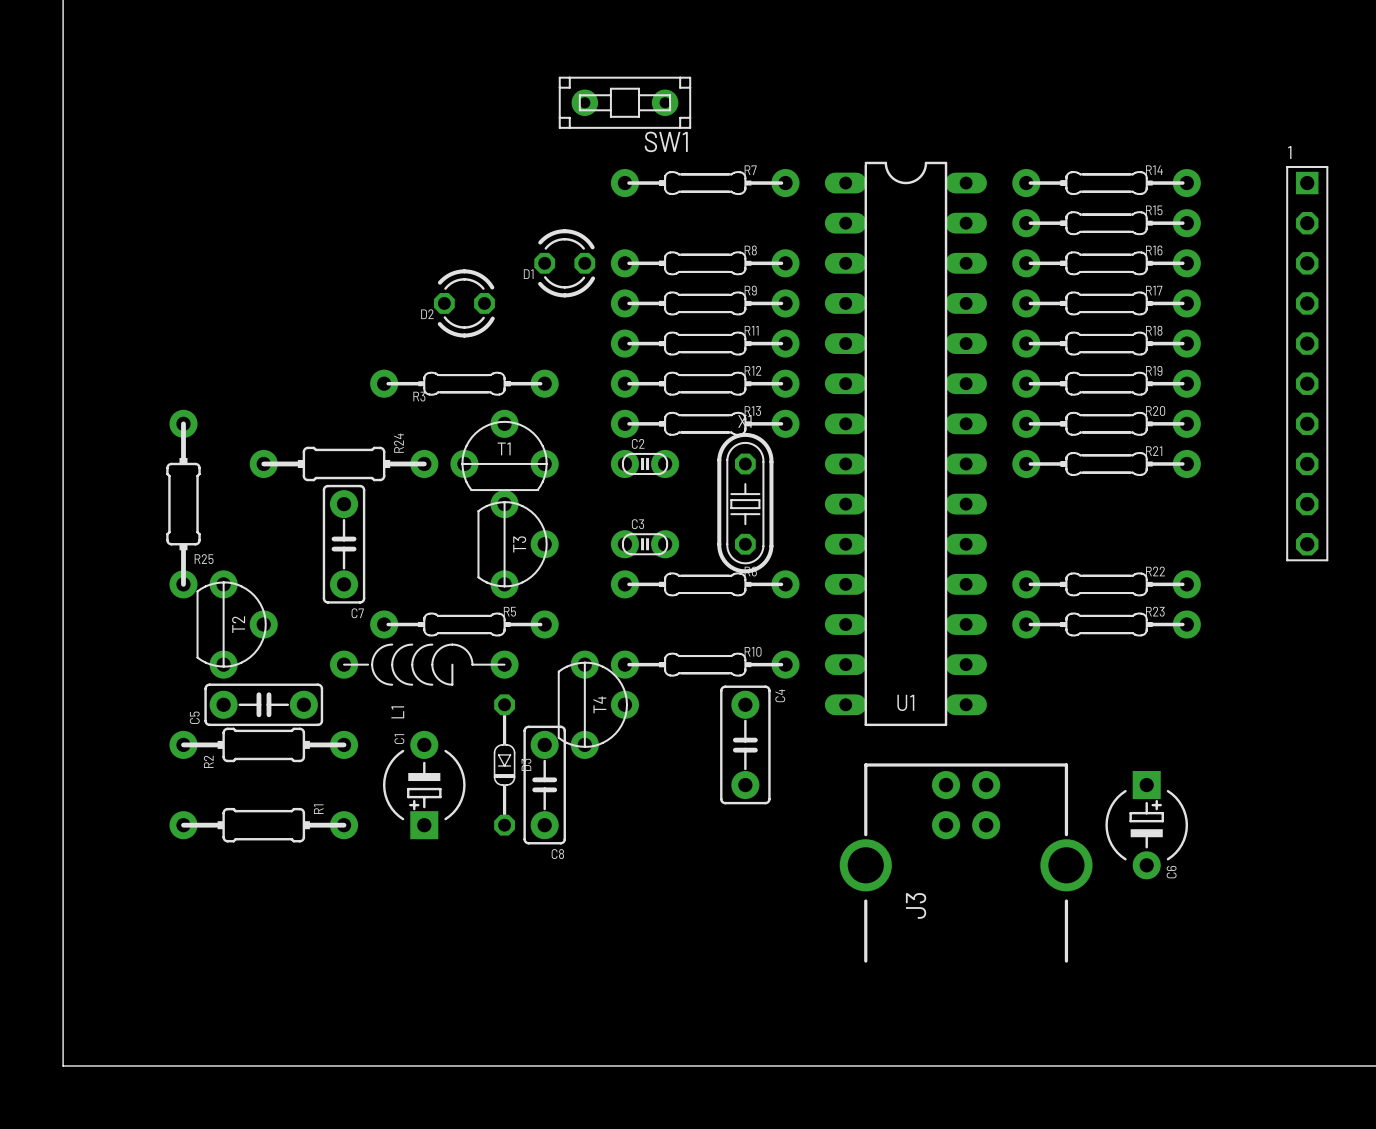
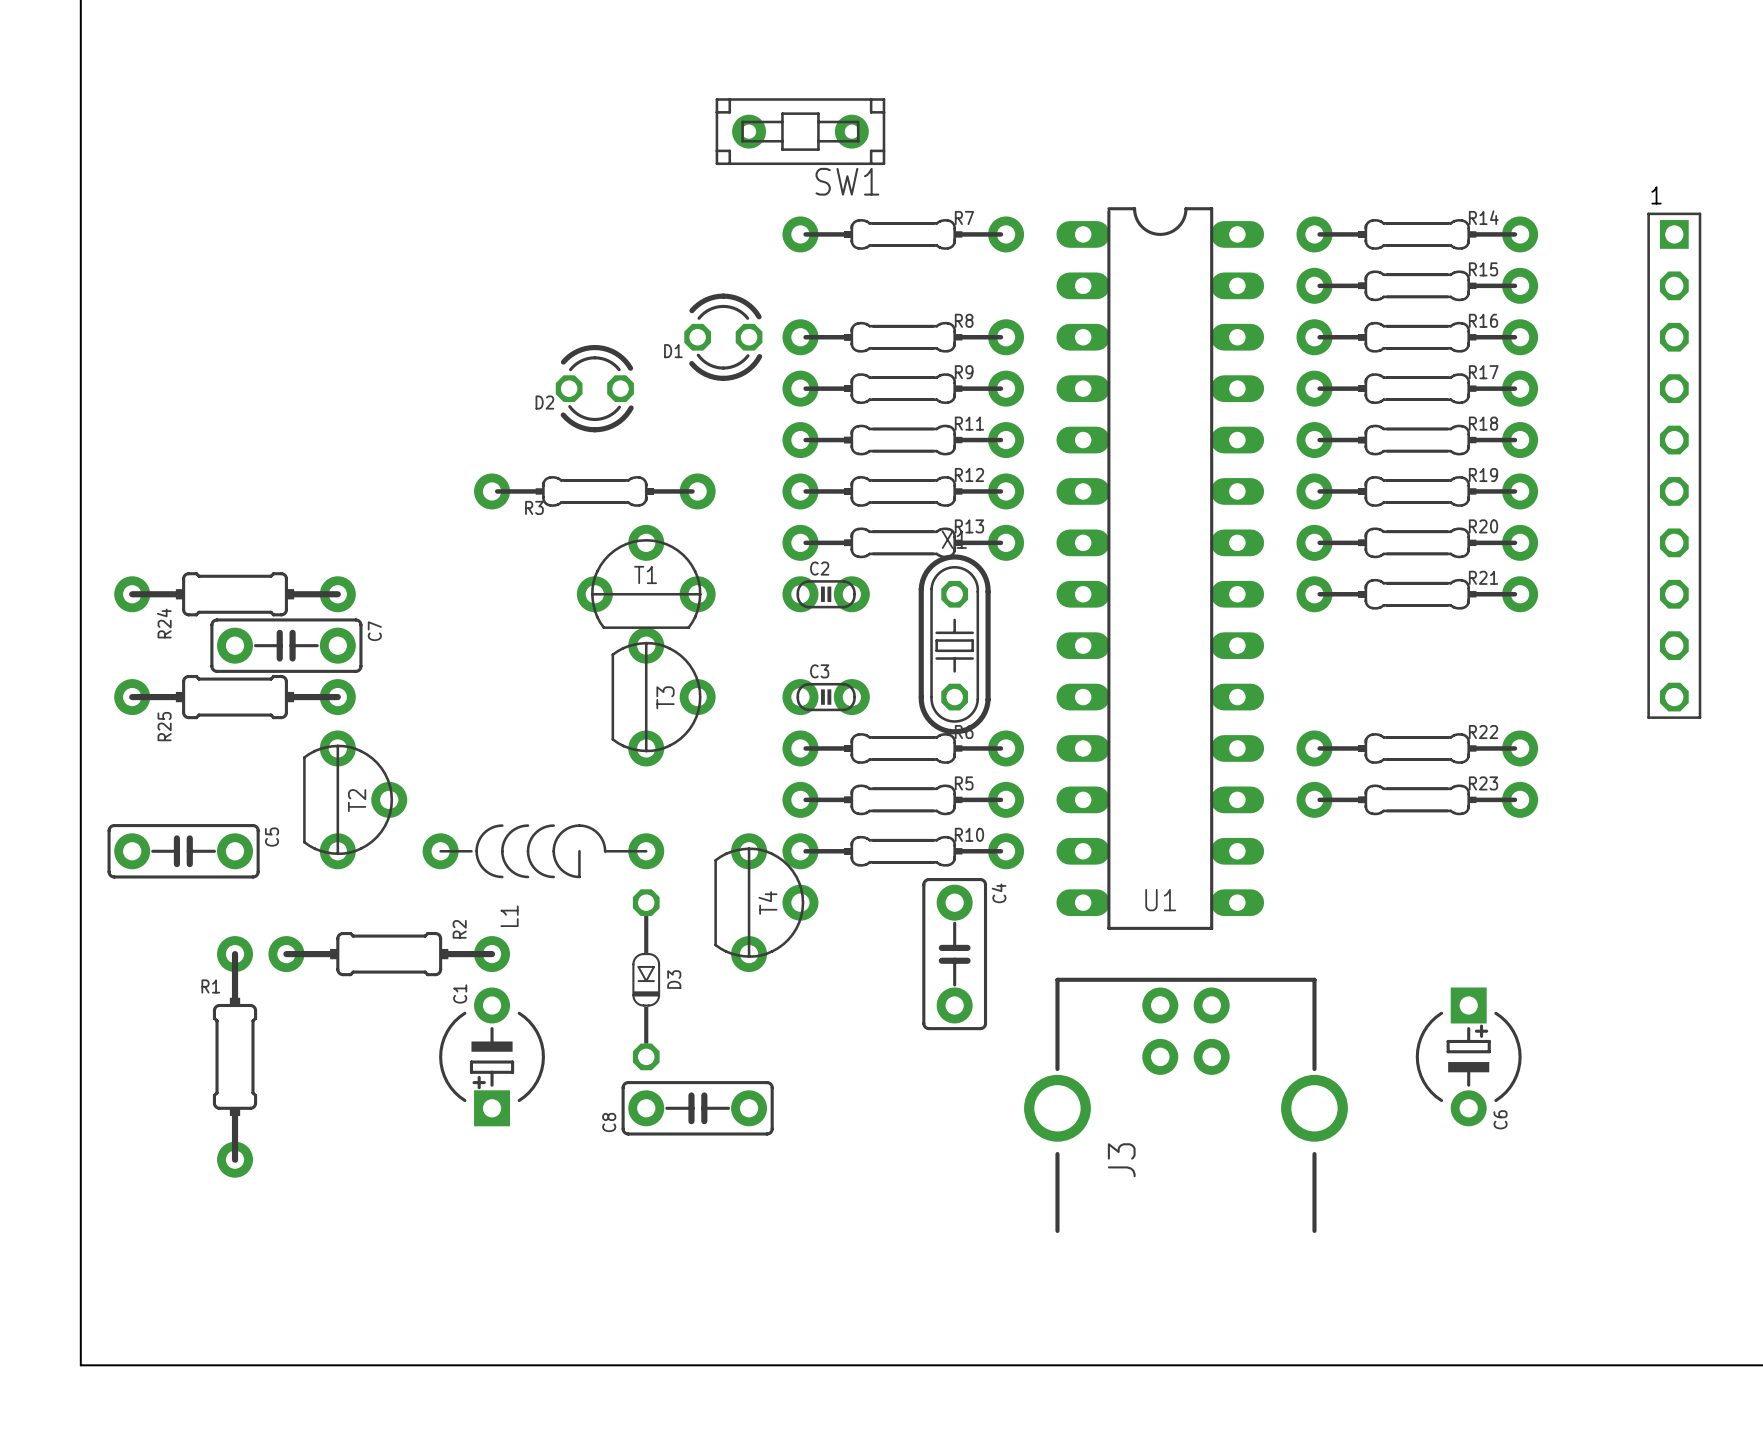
R24 name position: R24 (398, 443) -> R24 (164, 623)
R24 position: (344, 463) -> (235, 594)
R25 rotation: 0° (183, 504) -> 90° clockwise (235, 697)
C7 rotation: 0° (344, 544) -> 90° counterclockwise (286, 645)
C7 position: (344, 544) -> (286, 645)
T2 position: (237, 624) -> (355, 799)
R5 position: (464, 624) -> (903, 799)
C5 rotation: 0° (263, 704) -> 180° (183, 851)
C5 position: (263, 704) -> (183, 851)
R2 position: (263, 744) -> (389, 954)
R2 name position: R2 (208, 761) -> R2 (459, 929)
C1 position: (424, 785) -> (492, 1056)
C8 rotation: 0° (544, 785) -> 90° clockwise (697, 1108)
C8 position: (544, 785) -> (697, 1108)
R1 name position: R1 (318, 809) -> R1 (210, 986)
R1 rotation: 0° (263, 825) -> 90° clockwise (235, 1056)
J3 position: (966, 863) -> (1185, 1105)

